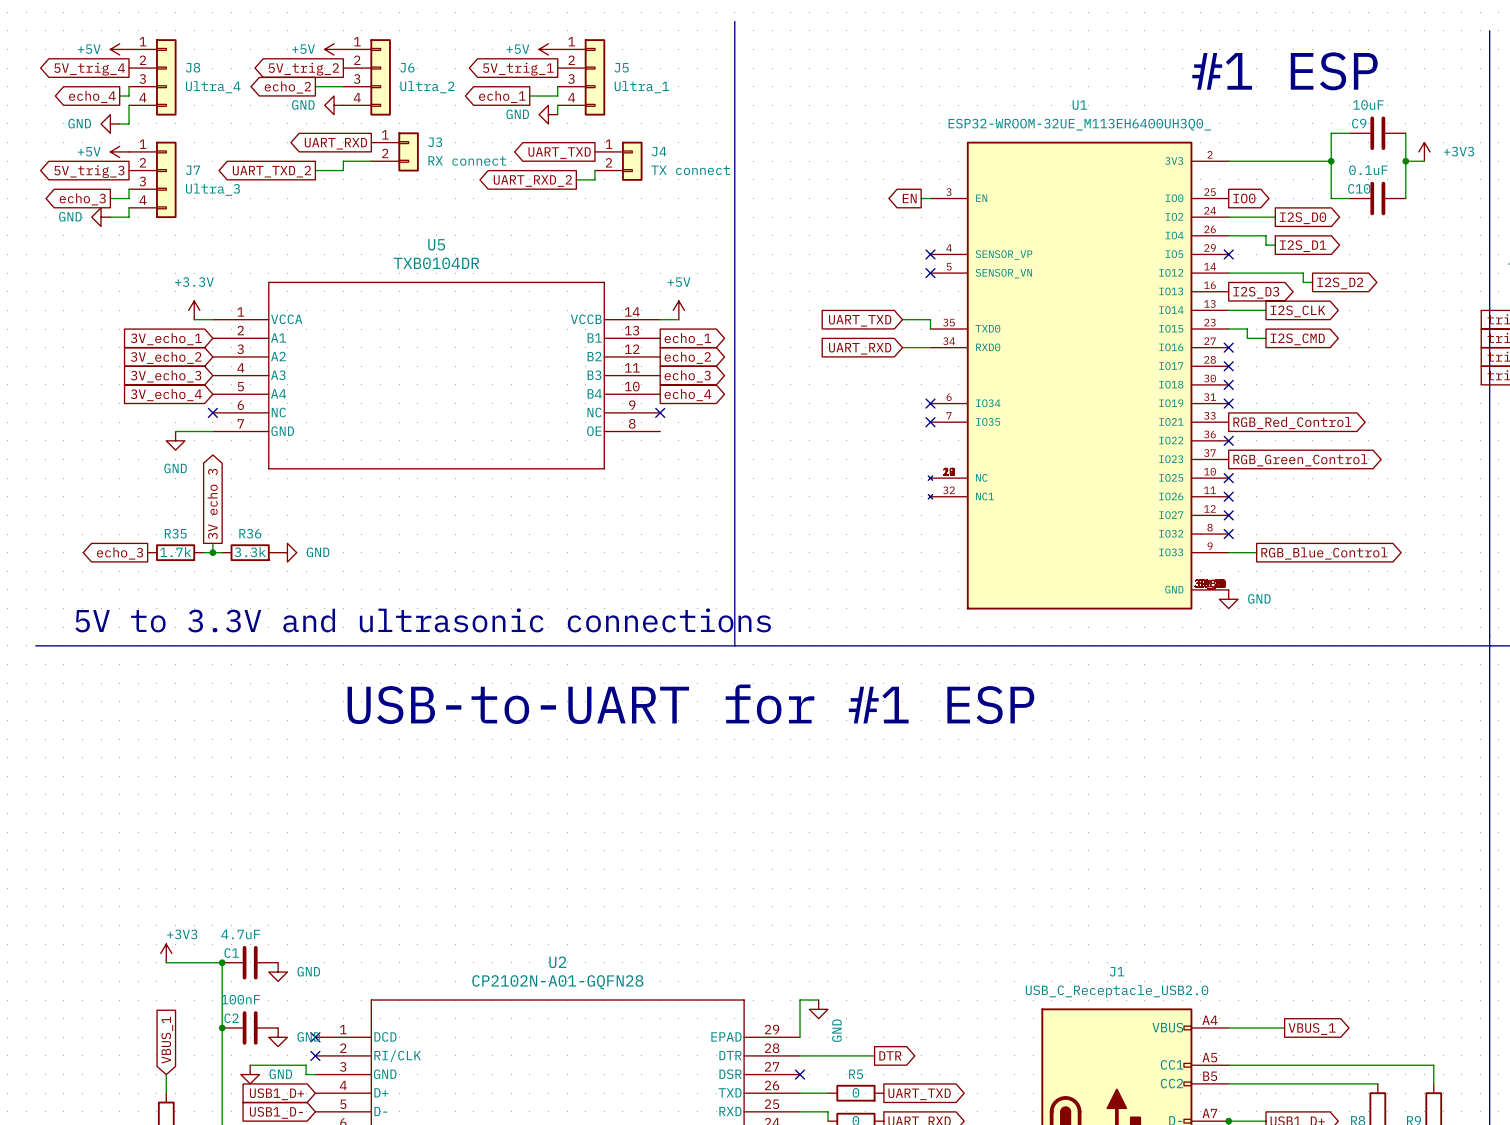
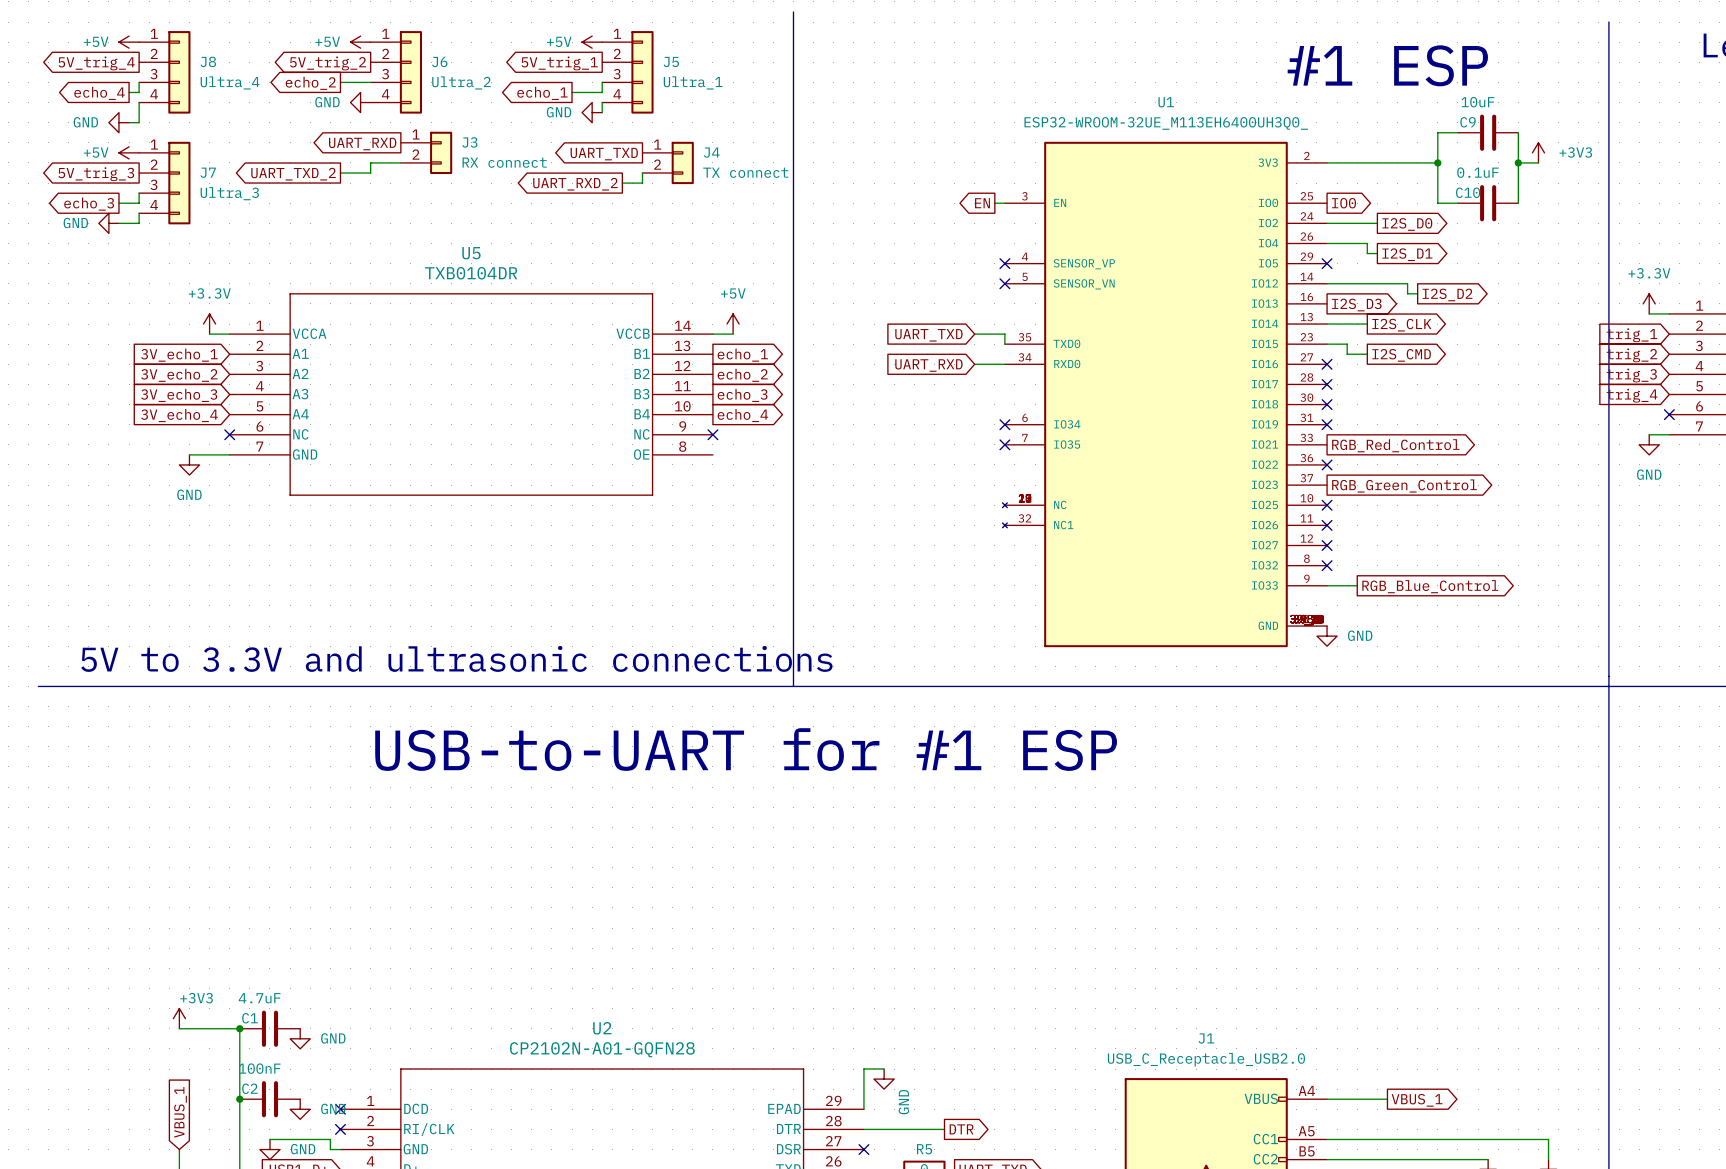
global label: 3V echo 3 (212, 504) -> none
wire: (212, 543) (212, 552) -> none
R35: 1.7k (175, 552) -> none
wire: (203, 552) (222, 552) -> none
junction: (212, 552) -> none
R36: 3.3k (250, 552) -> none
power symbol: GND (287, 552) -> none
global label: echo_3 (120, 553) -> none

